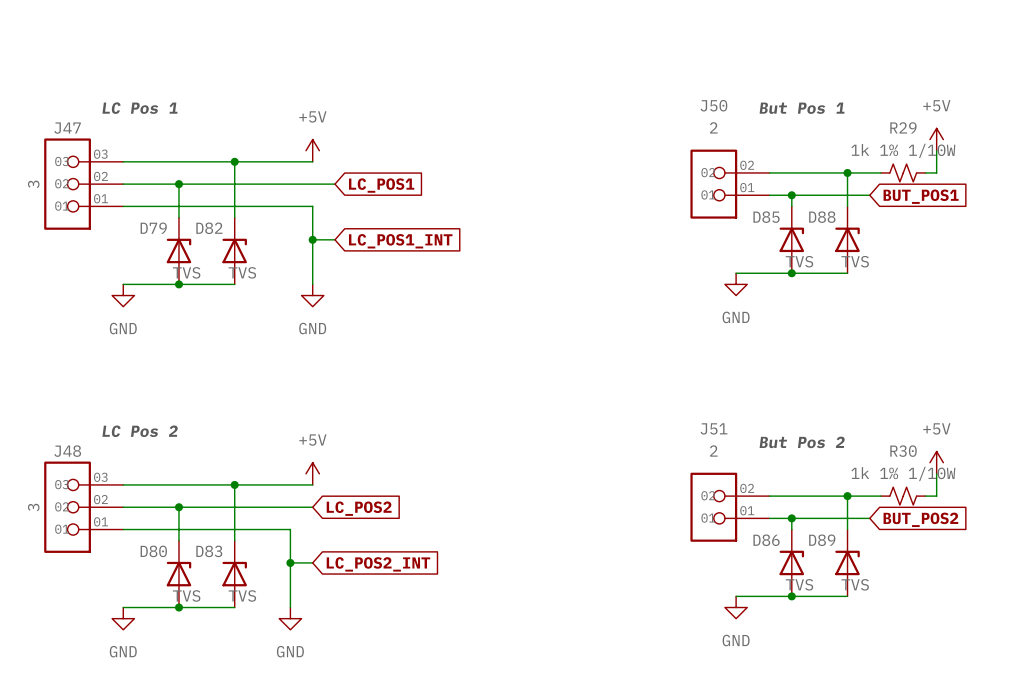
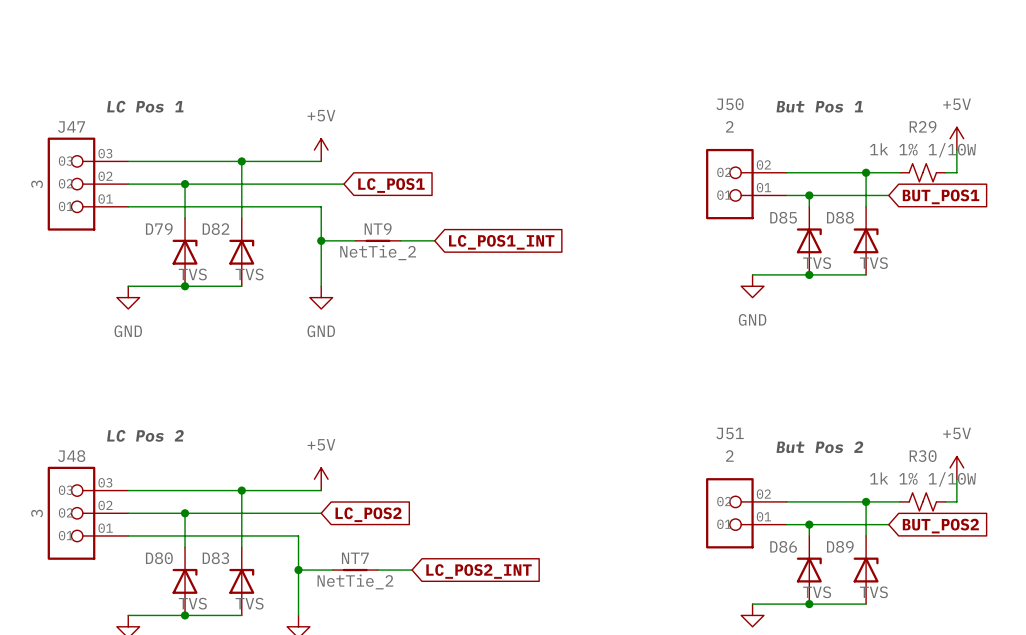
wire: none -> (343, 240) (355, 240)
NT9: none -> NetTie_2 (377, 240)
wire: none -> (400, 240) (434, 240)
global label position: LC_POS1_INT (400, 241) -> LC_POS1_INT (501, 242)
wire: none -> (321, 570) (332, 570)
NT7: none -> NetTie_2 (355, 570)
wire: none -> (377, 570) (412, 570)
global label position: LC_POS2_INT (378, 564) -> LC_POS2_INT (479, 571)

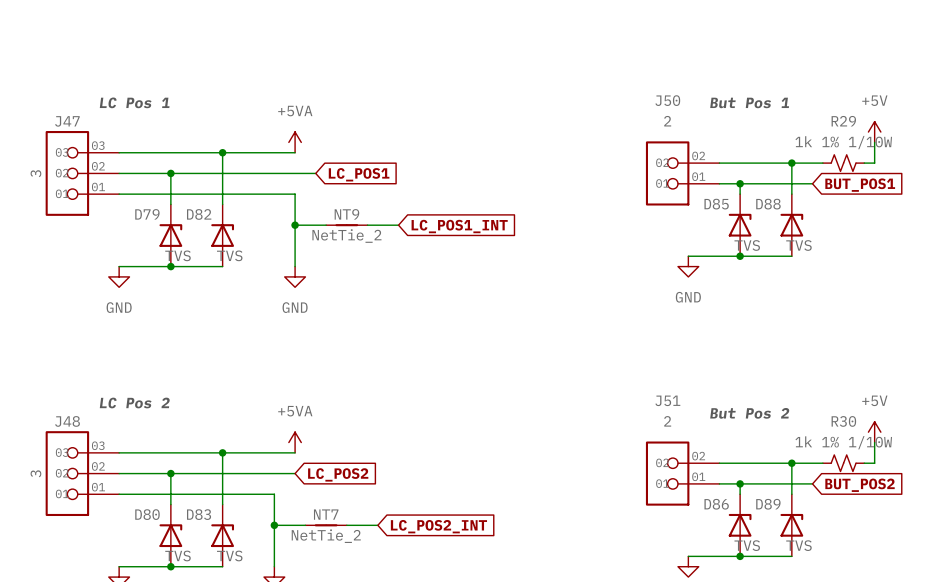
power symbol: +5V (321, 150) -> +5VA (295, 142)
power symbol: +5V (321, 479) -> +5VA (295, 442)

